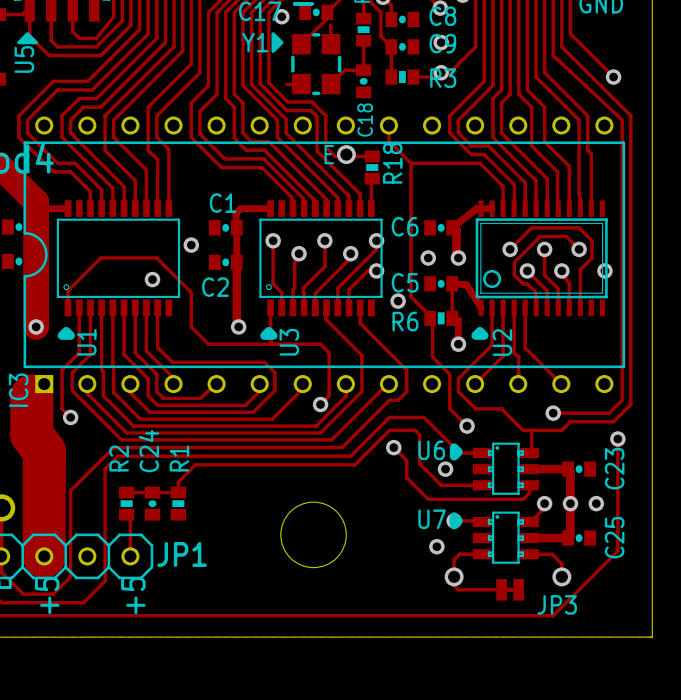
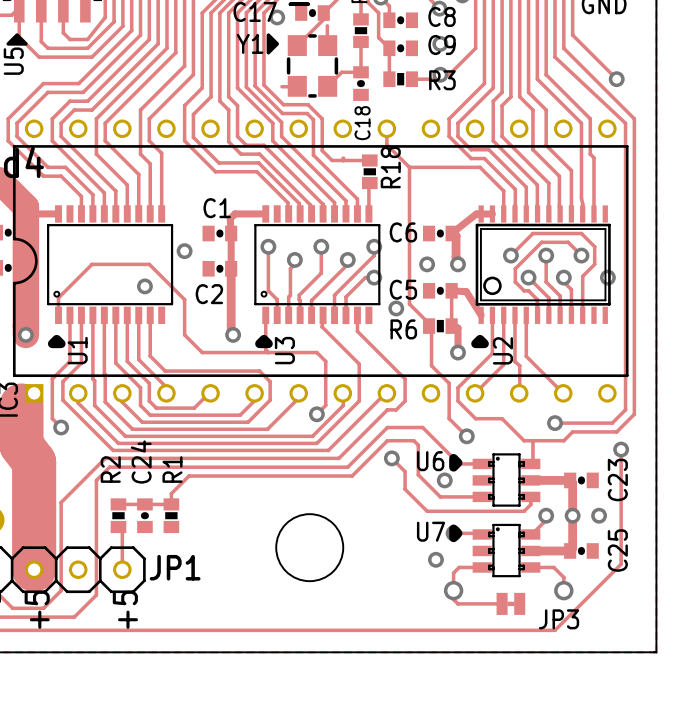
text: E (329, 154) -> none
via: (346, 154) -> none

